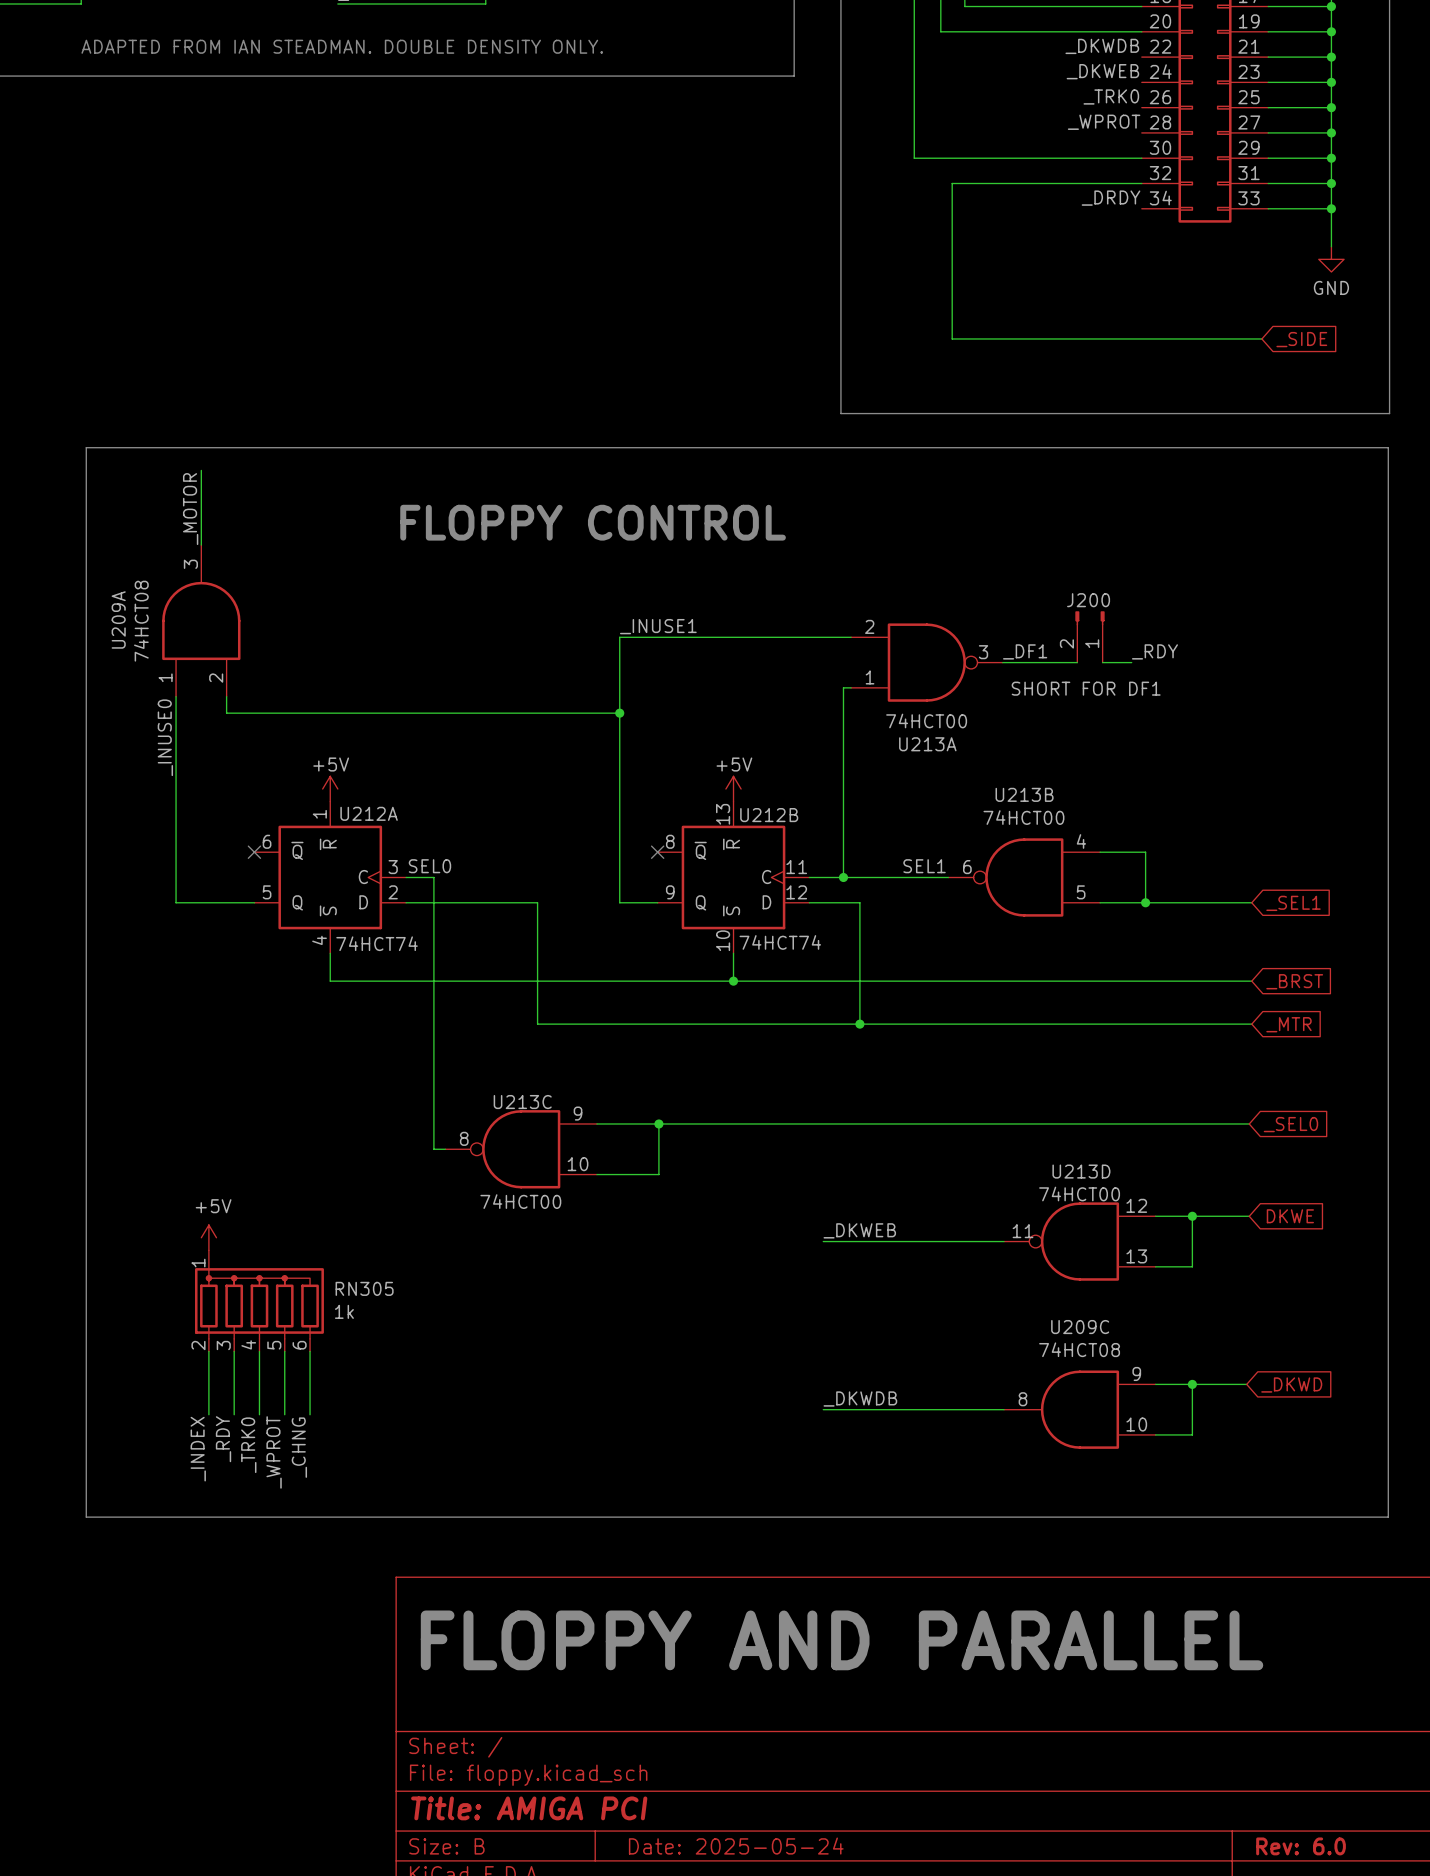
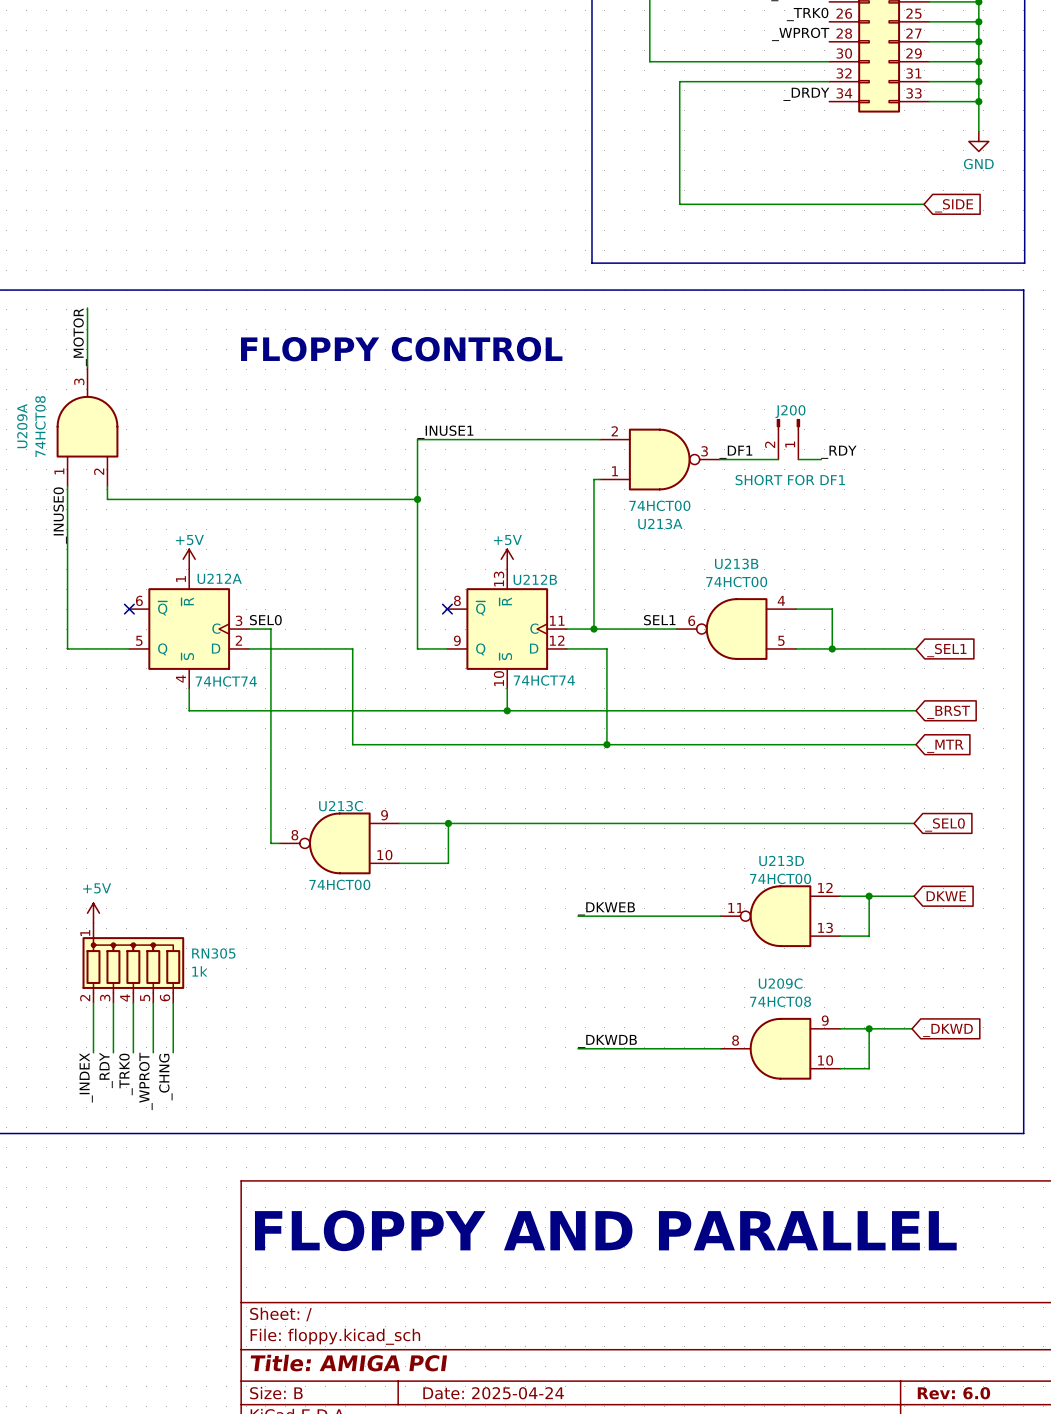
title block: Date: 2025-05-24 (736, 1846) -> Date: 2025-04-24 (493, 1393)

